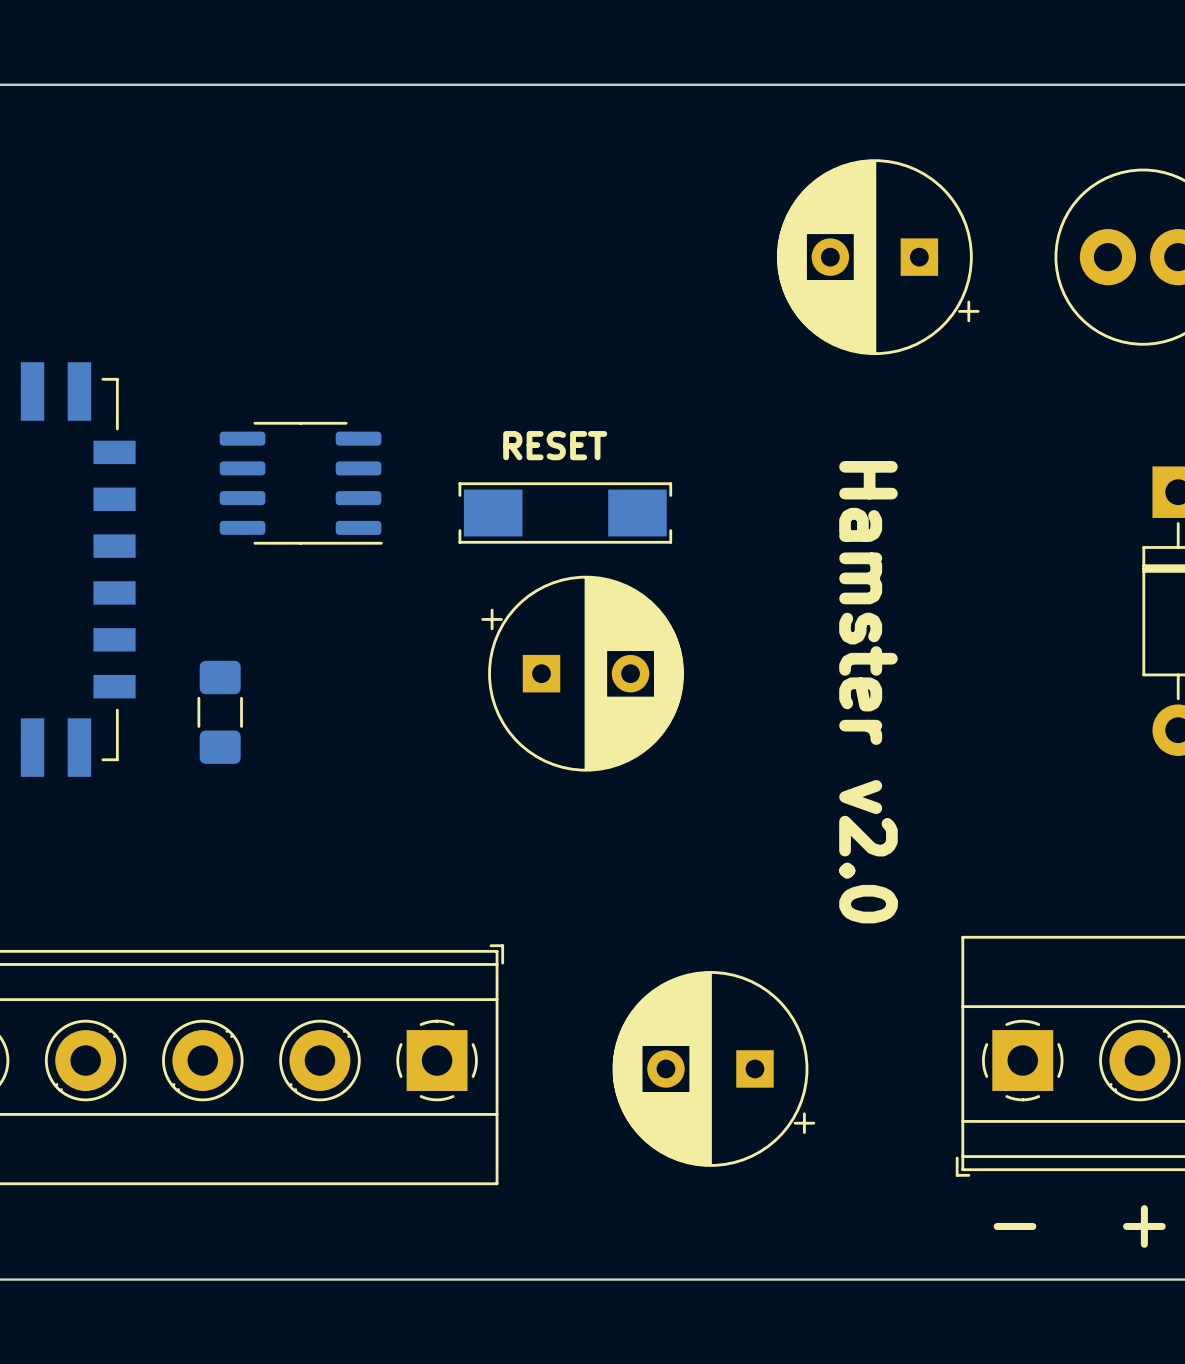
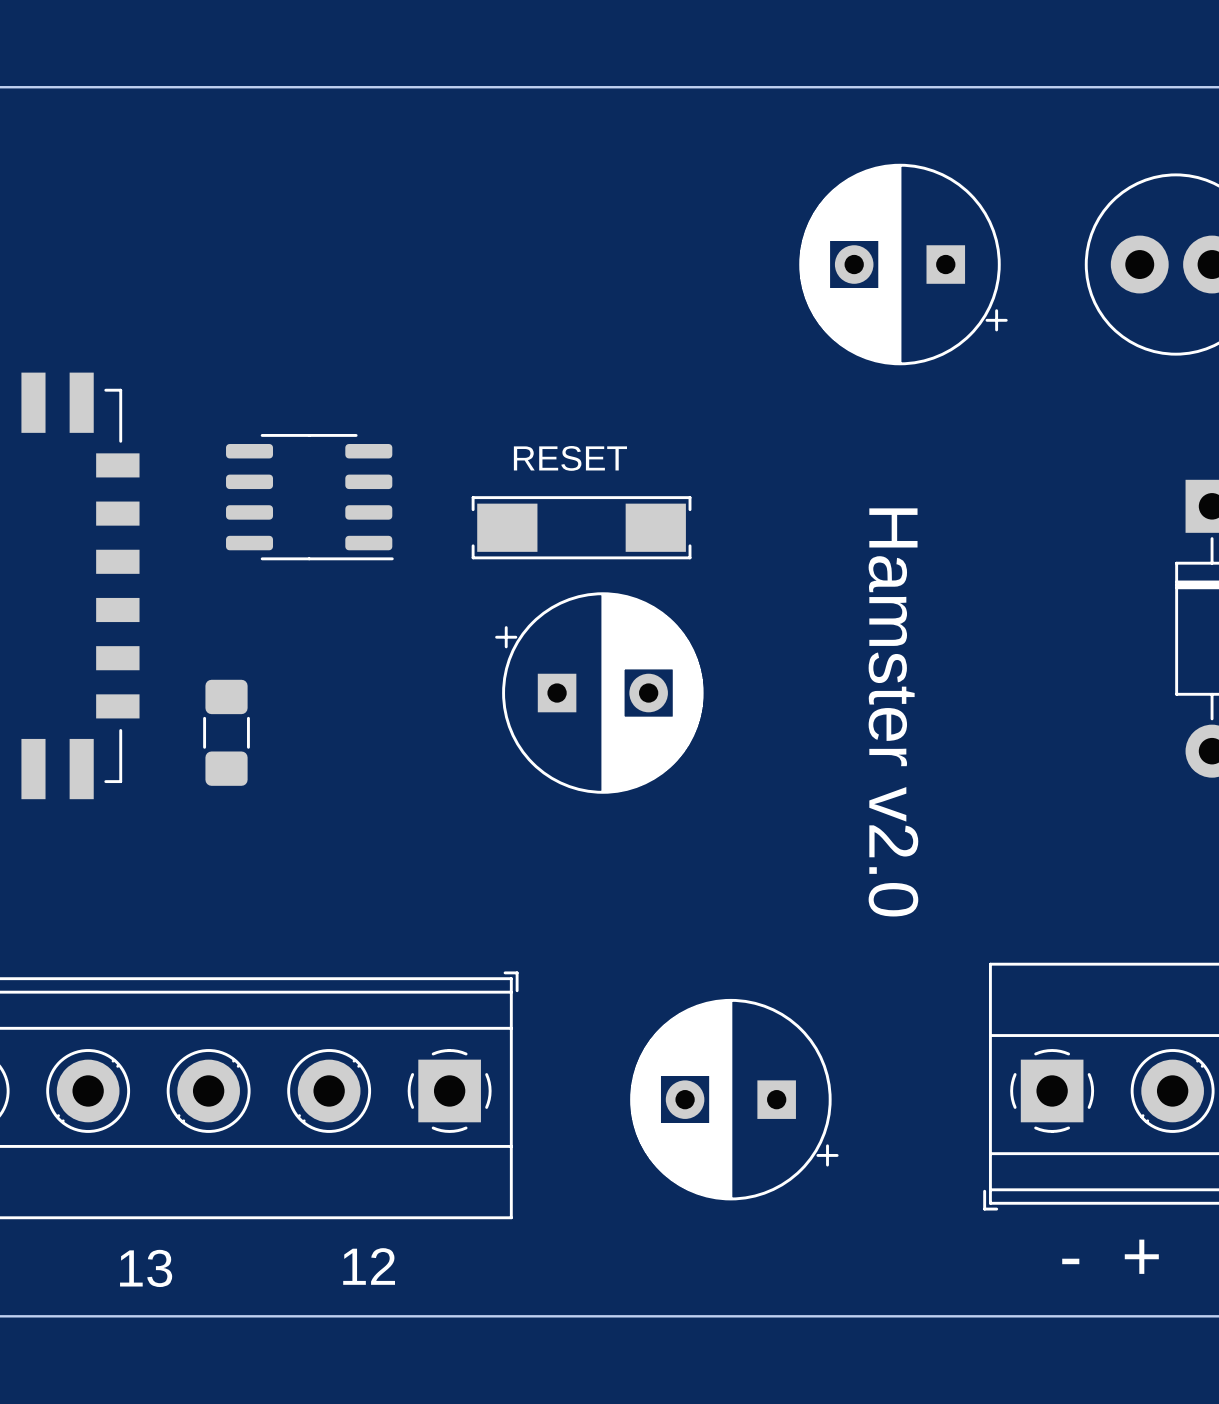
text: none -> 12 (369, 1266)
text: none -> 13 (146, 1268)

